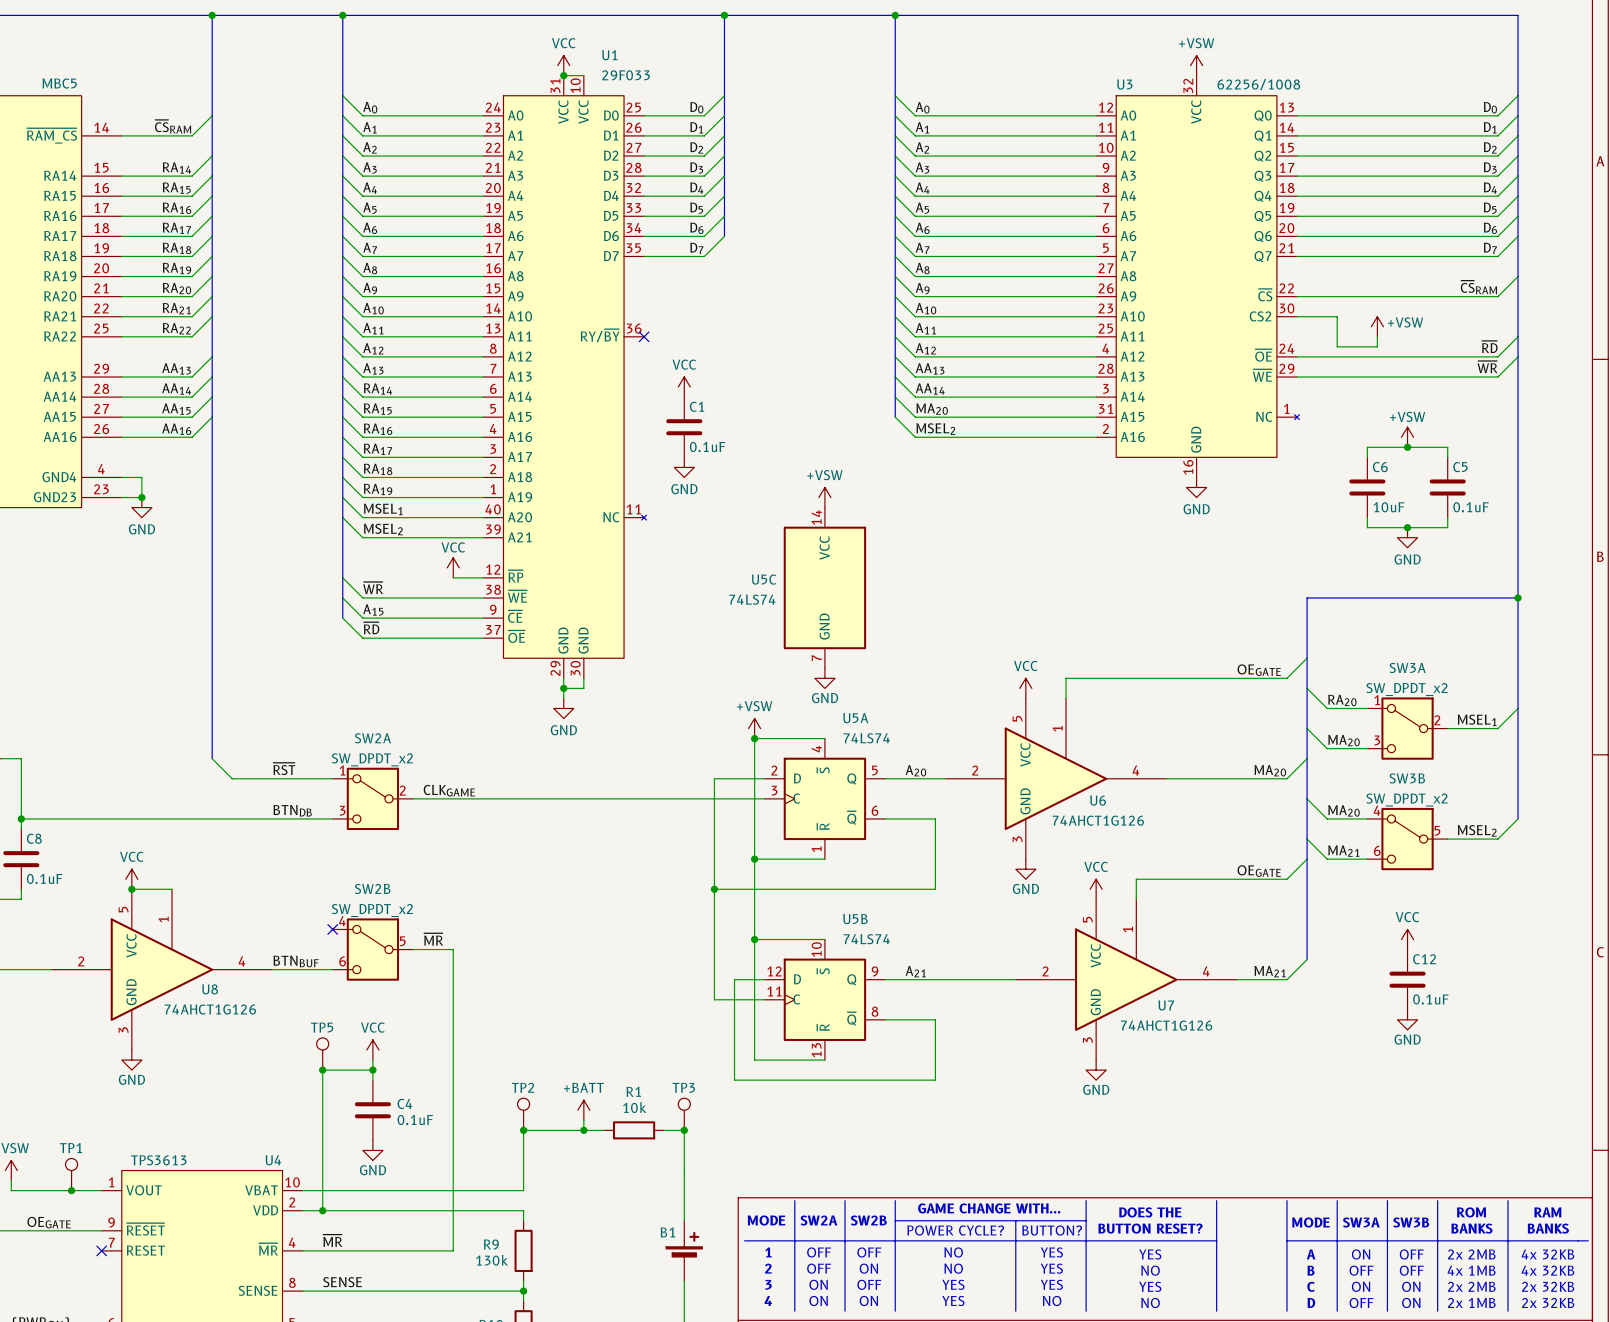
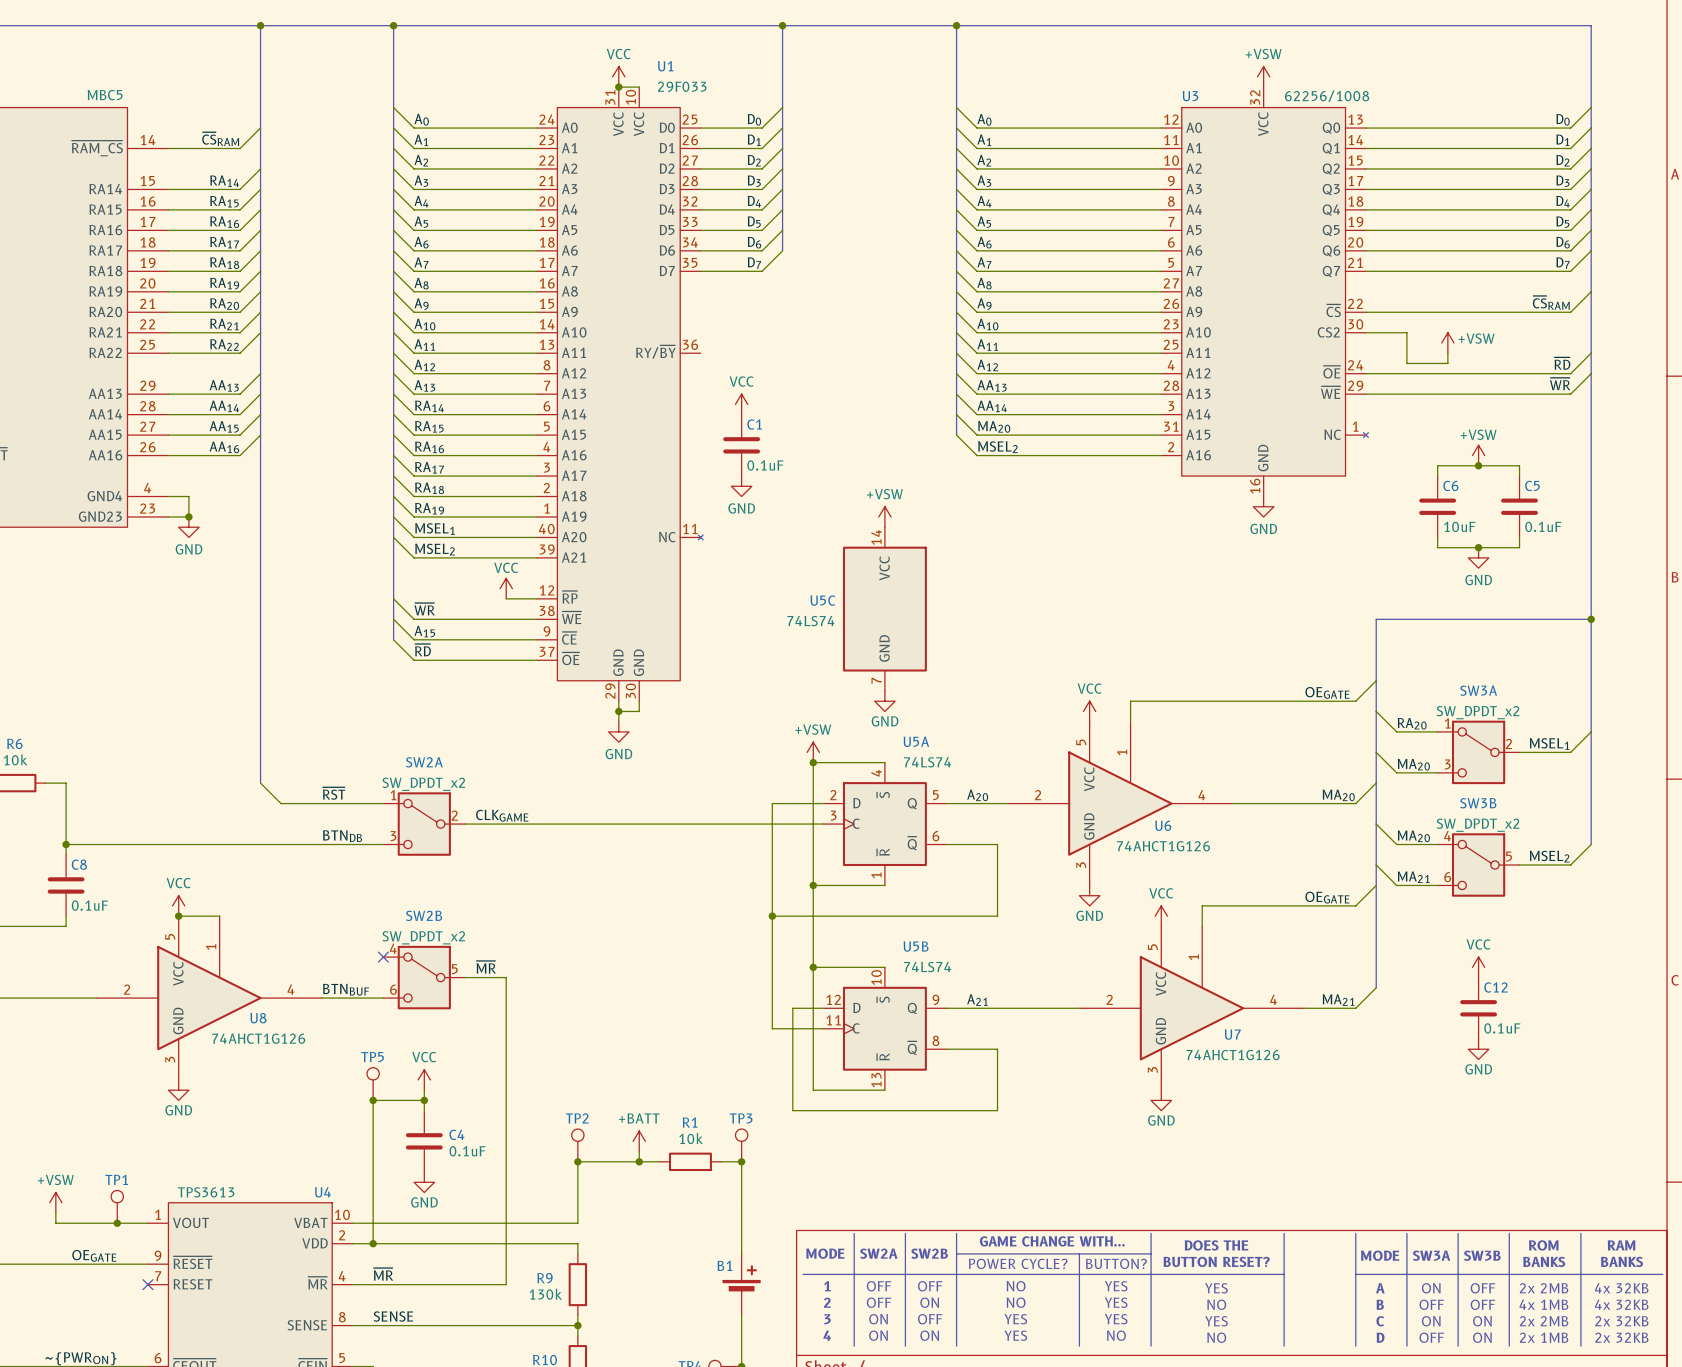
no-connect mark: (644, 336) -> none

